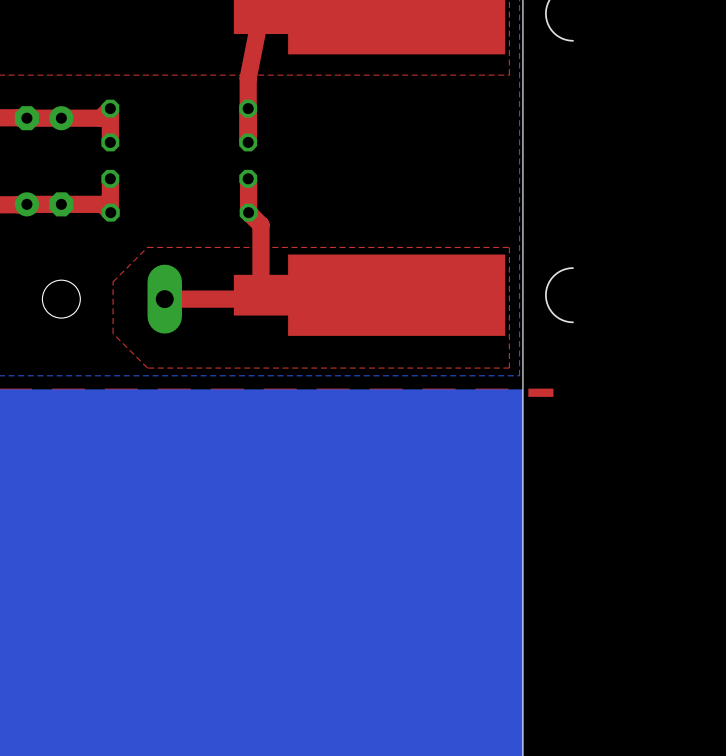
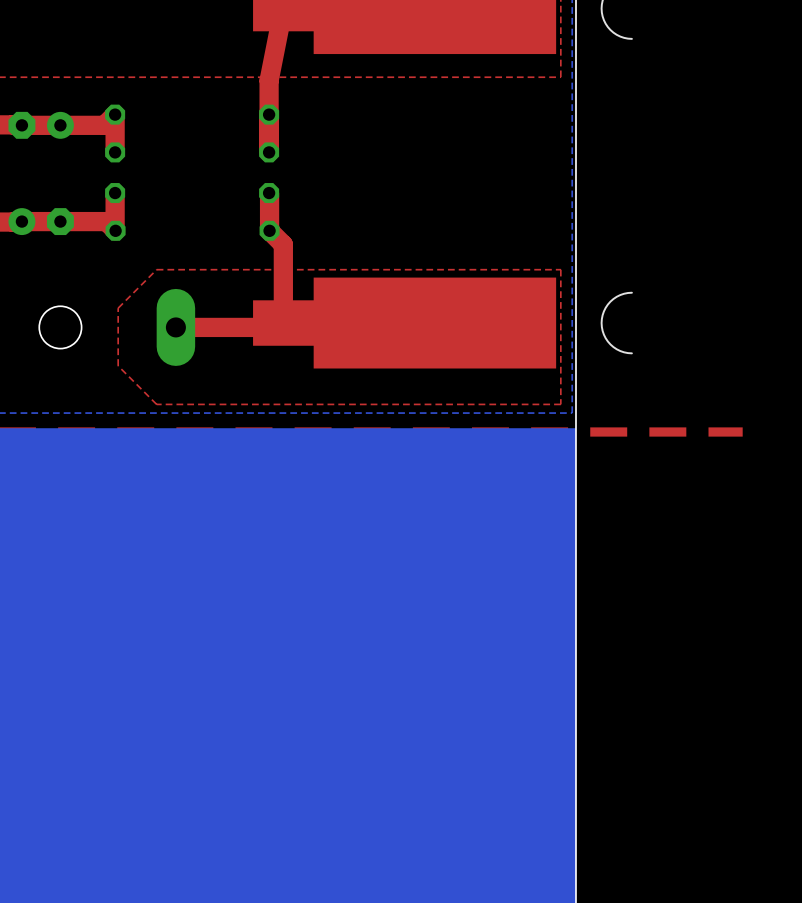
top track: none -> (742, 432) (610, 432)

